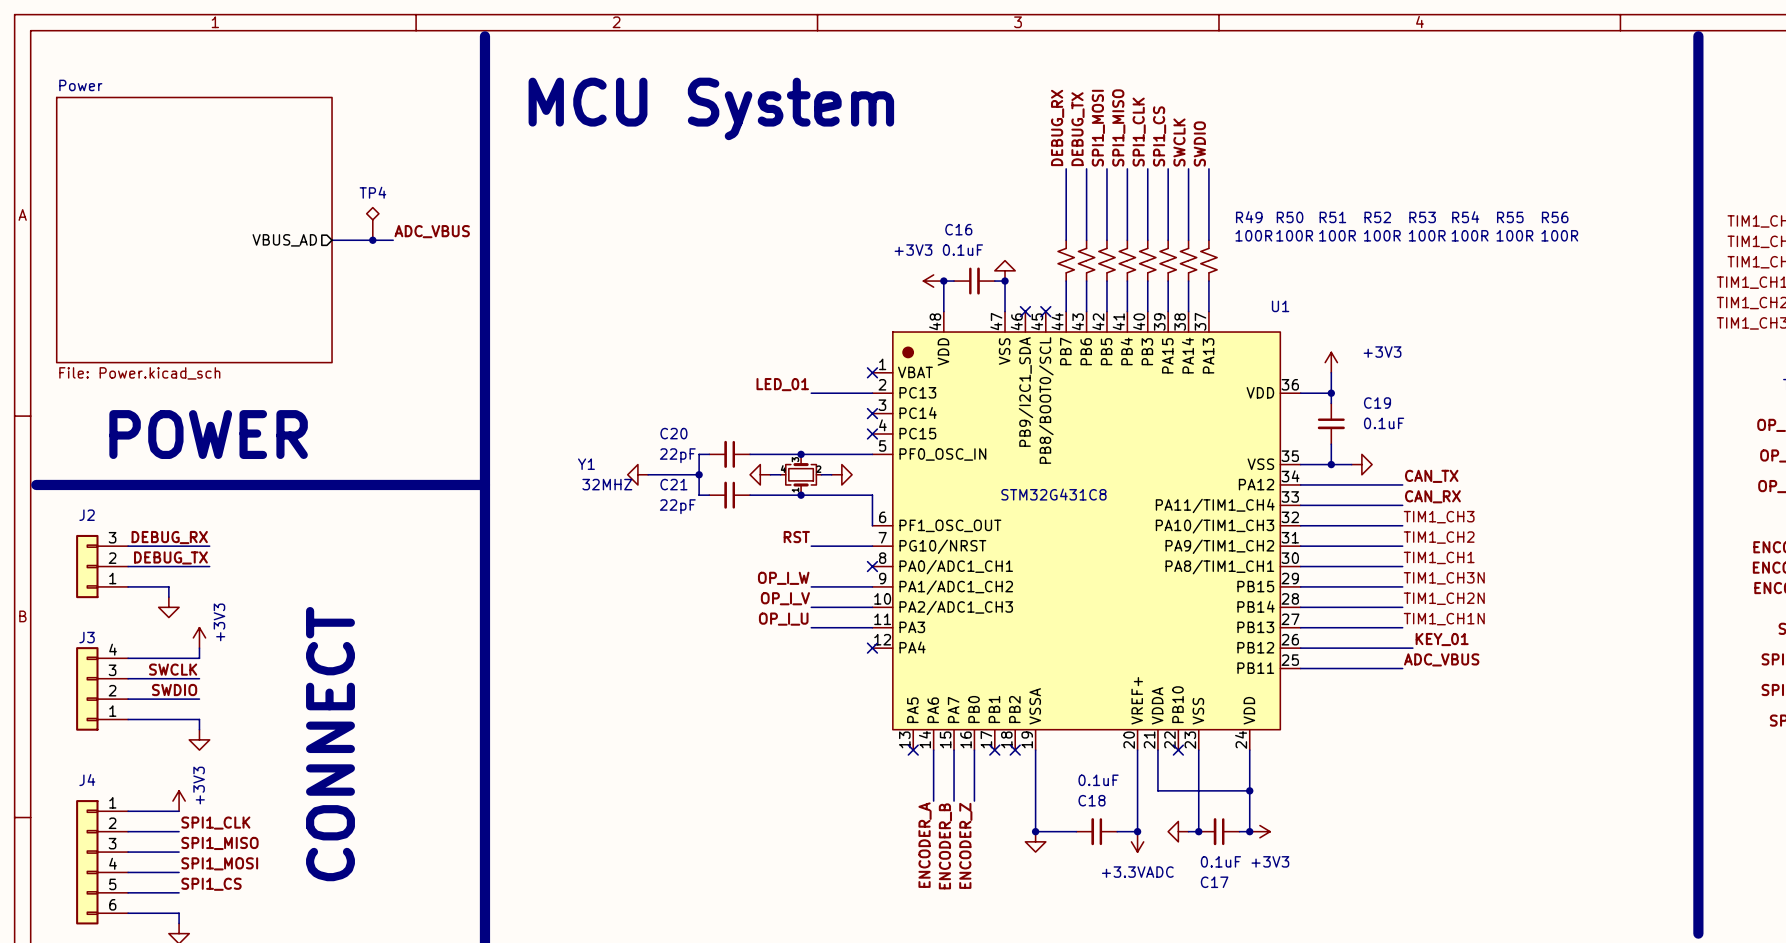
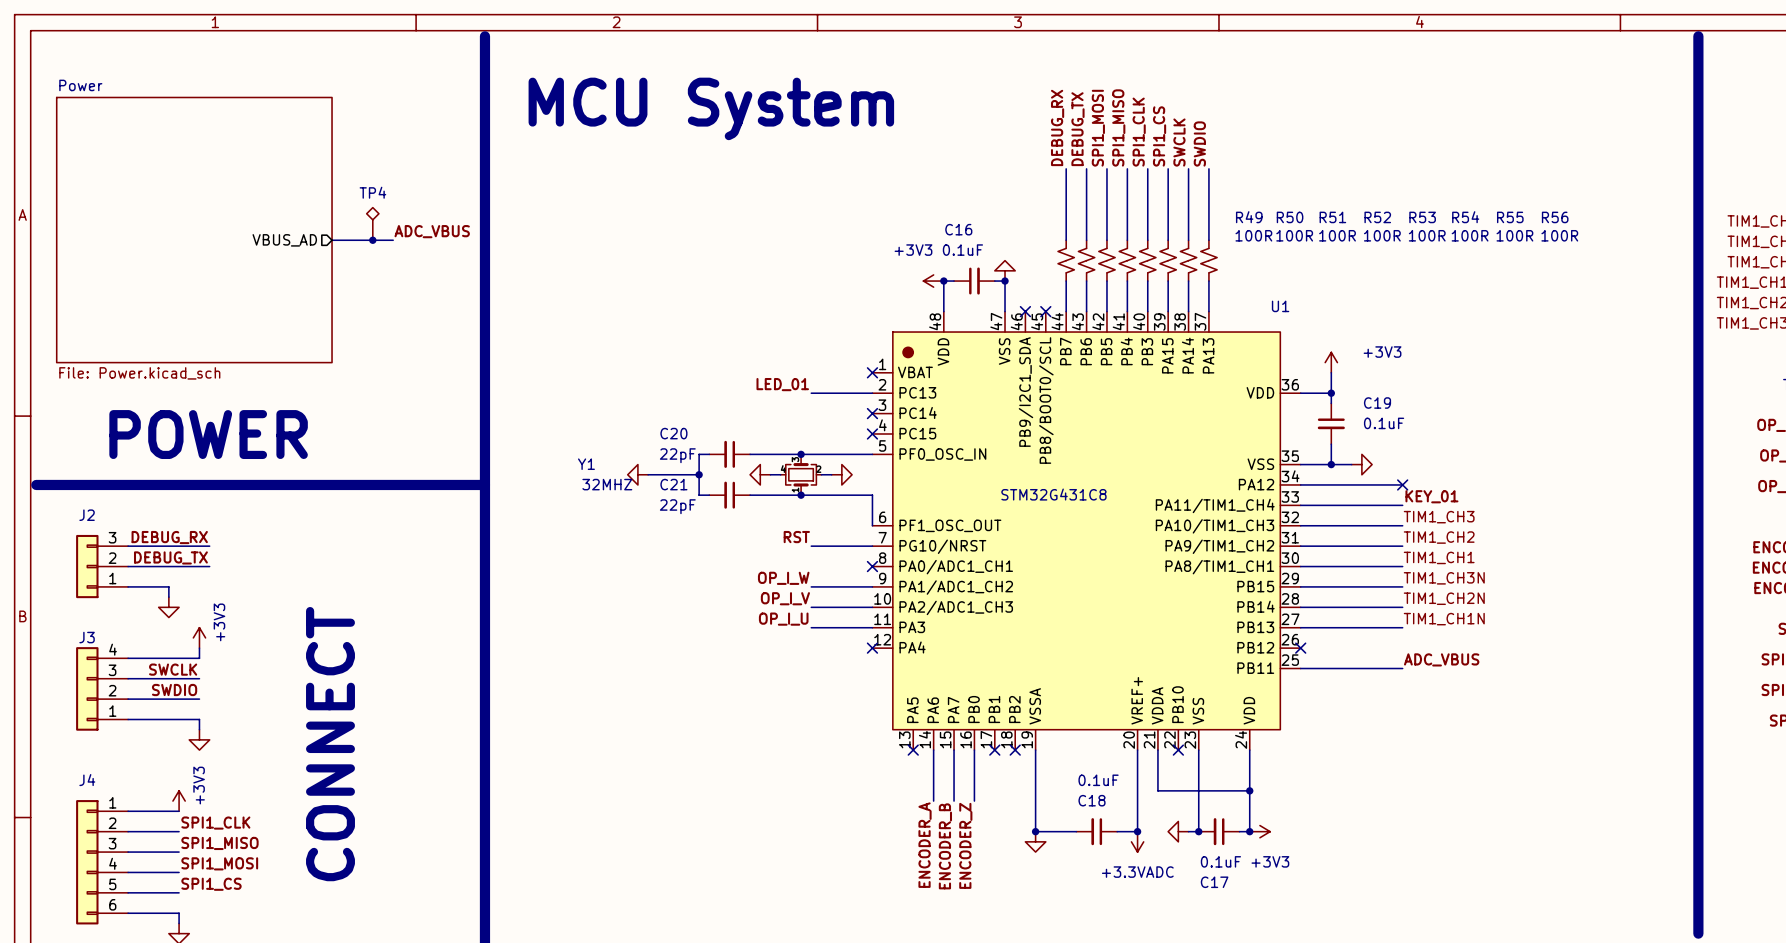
label: CAN_TX (1431, 476) -> none
no-connect mark: none -> (1402, 484)
label: CAN_RX (1432, 496) -> KEY_01 (1431, 496)
label: KEY_01 (1442, 639) -> none
wire: (1300, 648) (1412, 648) -> none
no-connect mark: none -> (1300, 648)

